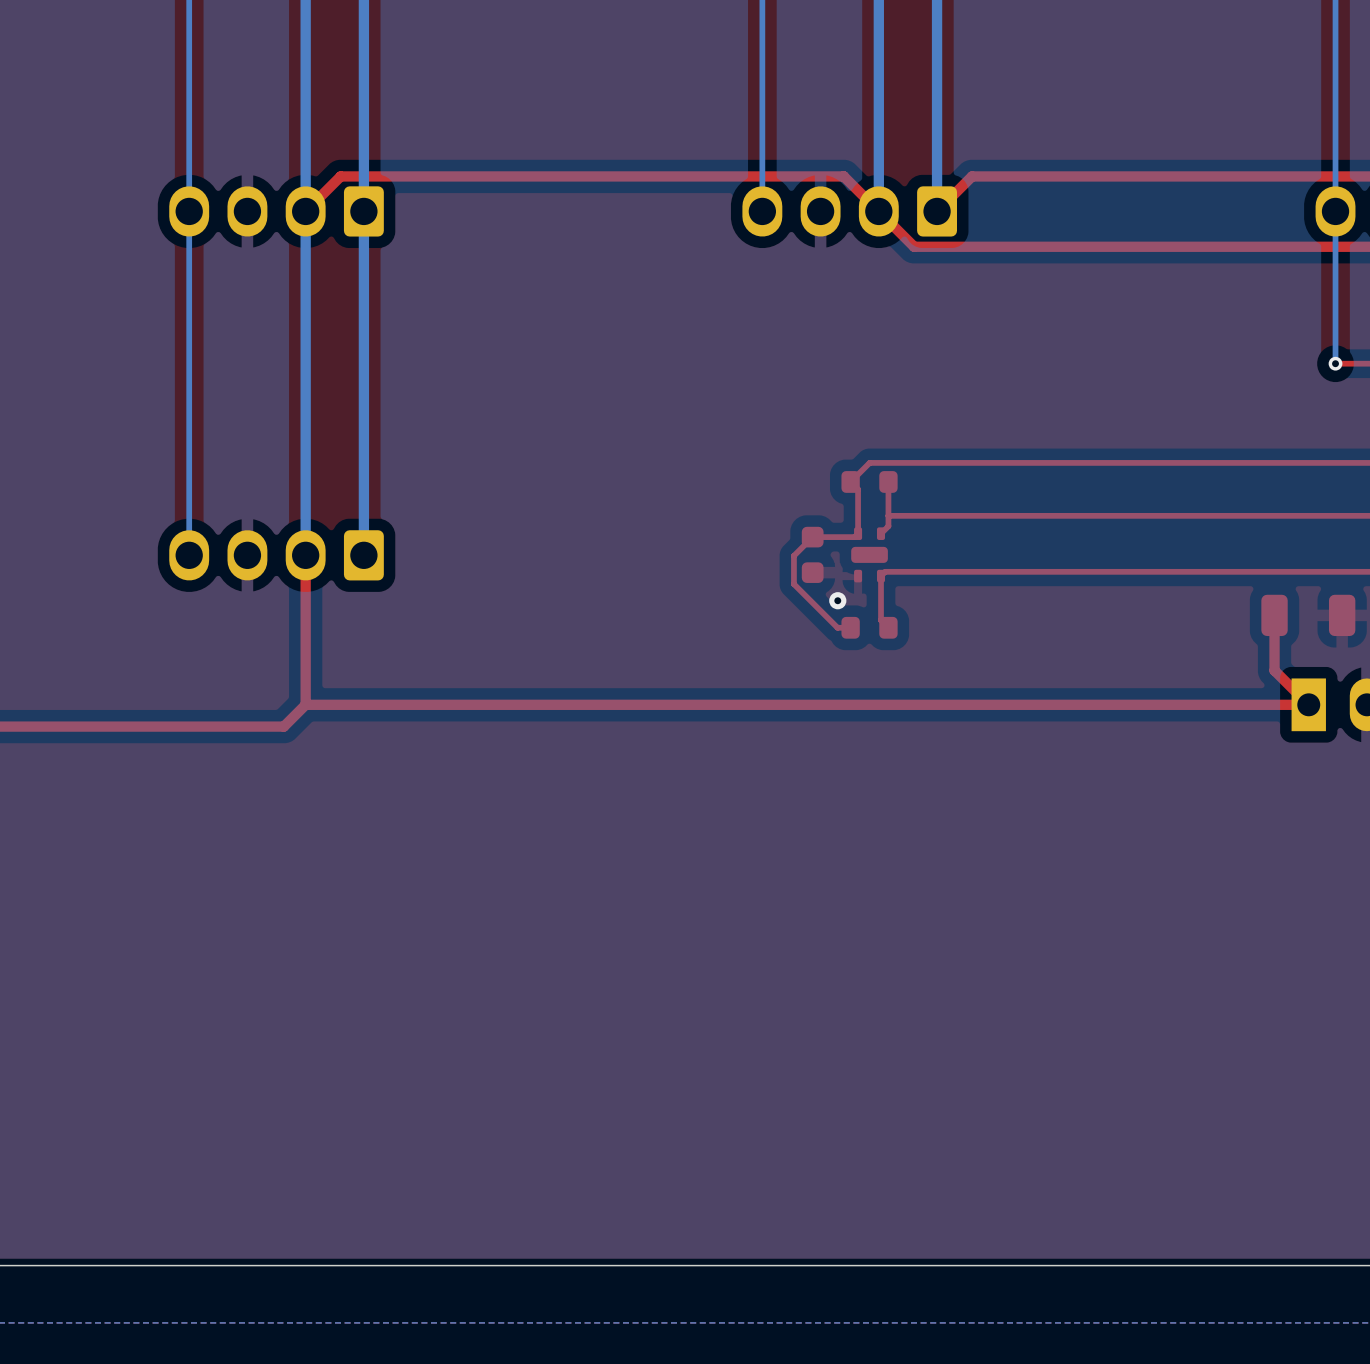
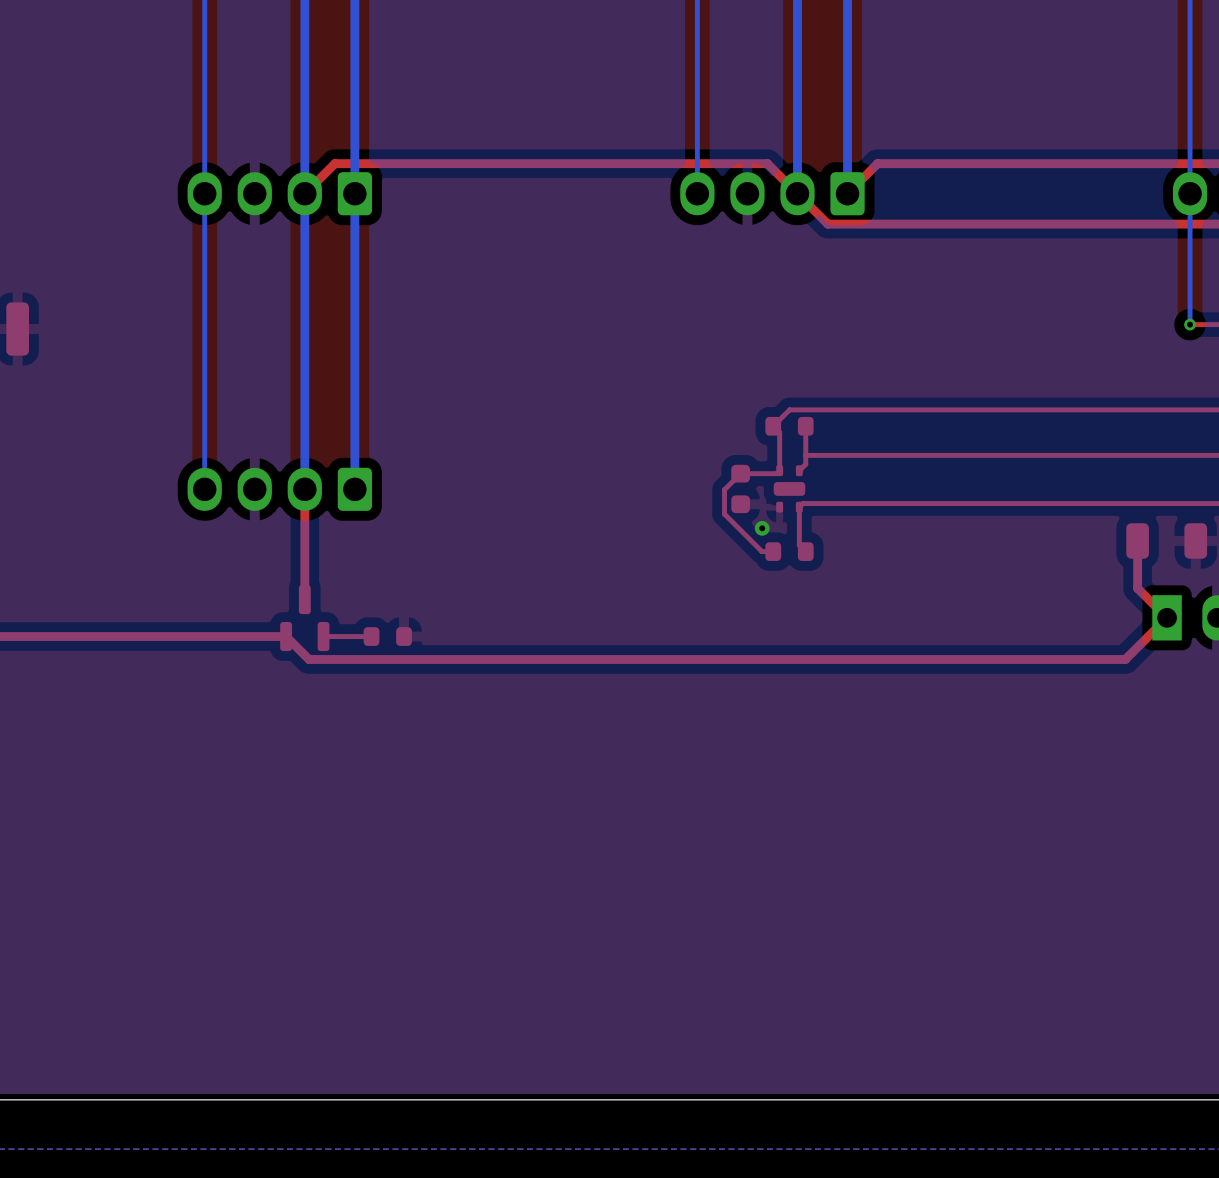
top track: (305, 683) (305, 704) -> none
top track: (305, 704) (283, 726) -> none
top track: (1308, 704) (305, 704) -> (1167, 617) (1125, 659) (309, 659) (286, 636)
part: none -> (304, 618)
top track: none -> (371, 636) (323, 636)
part: none -> (387, 636)

